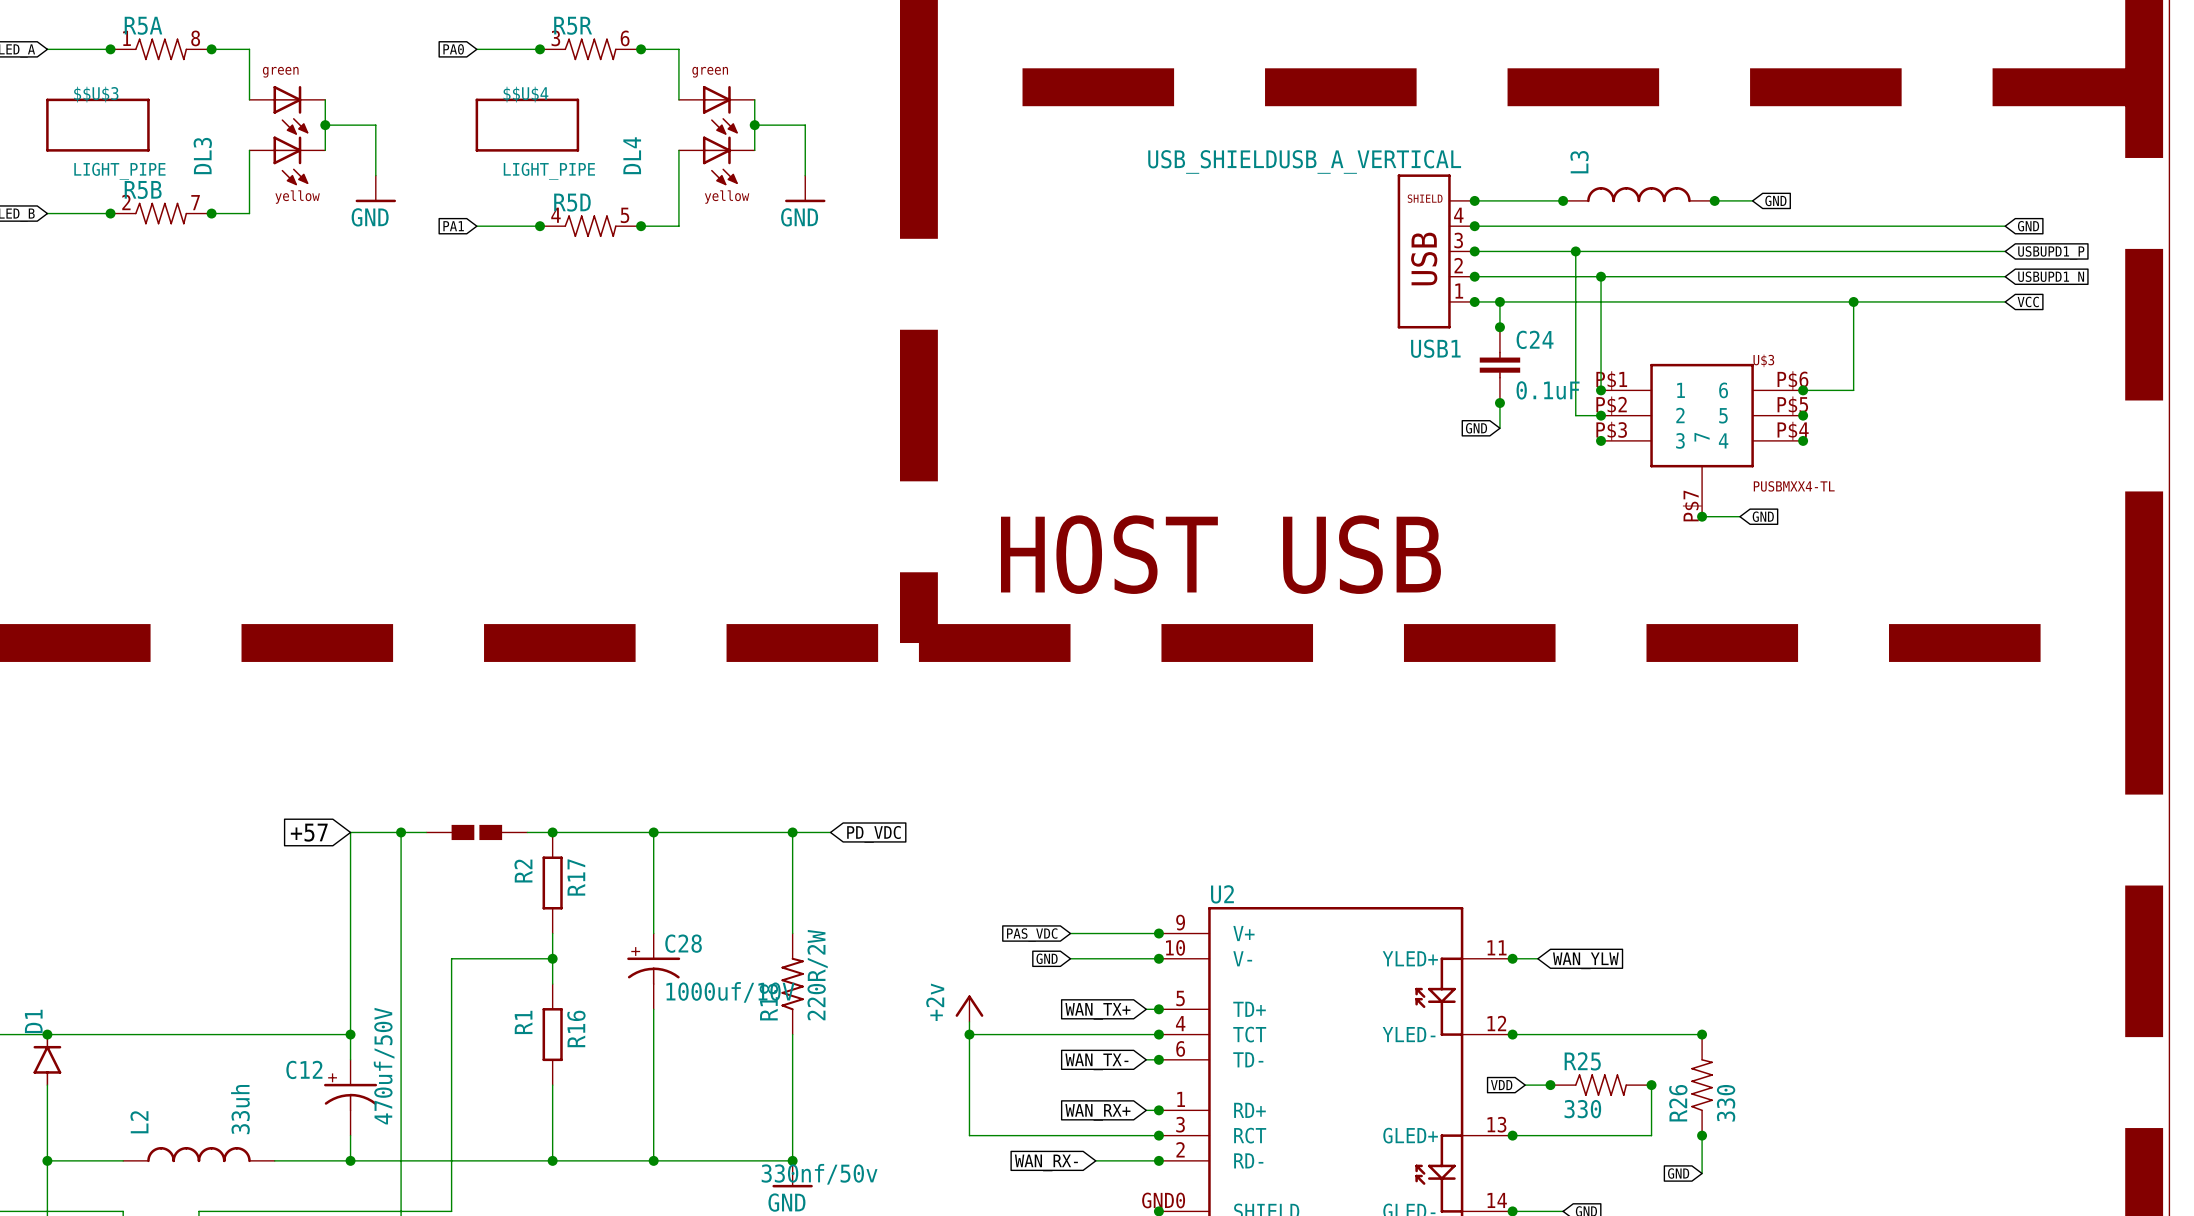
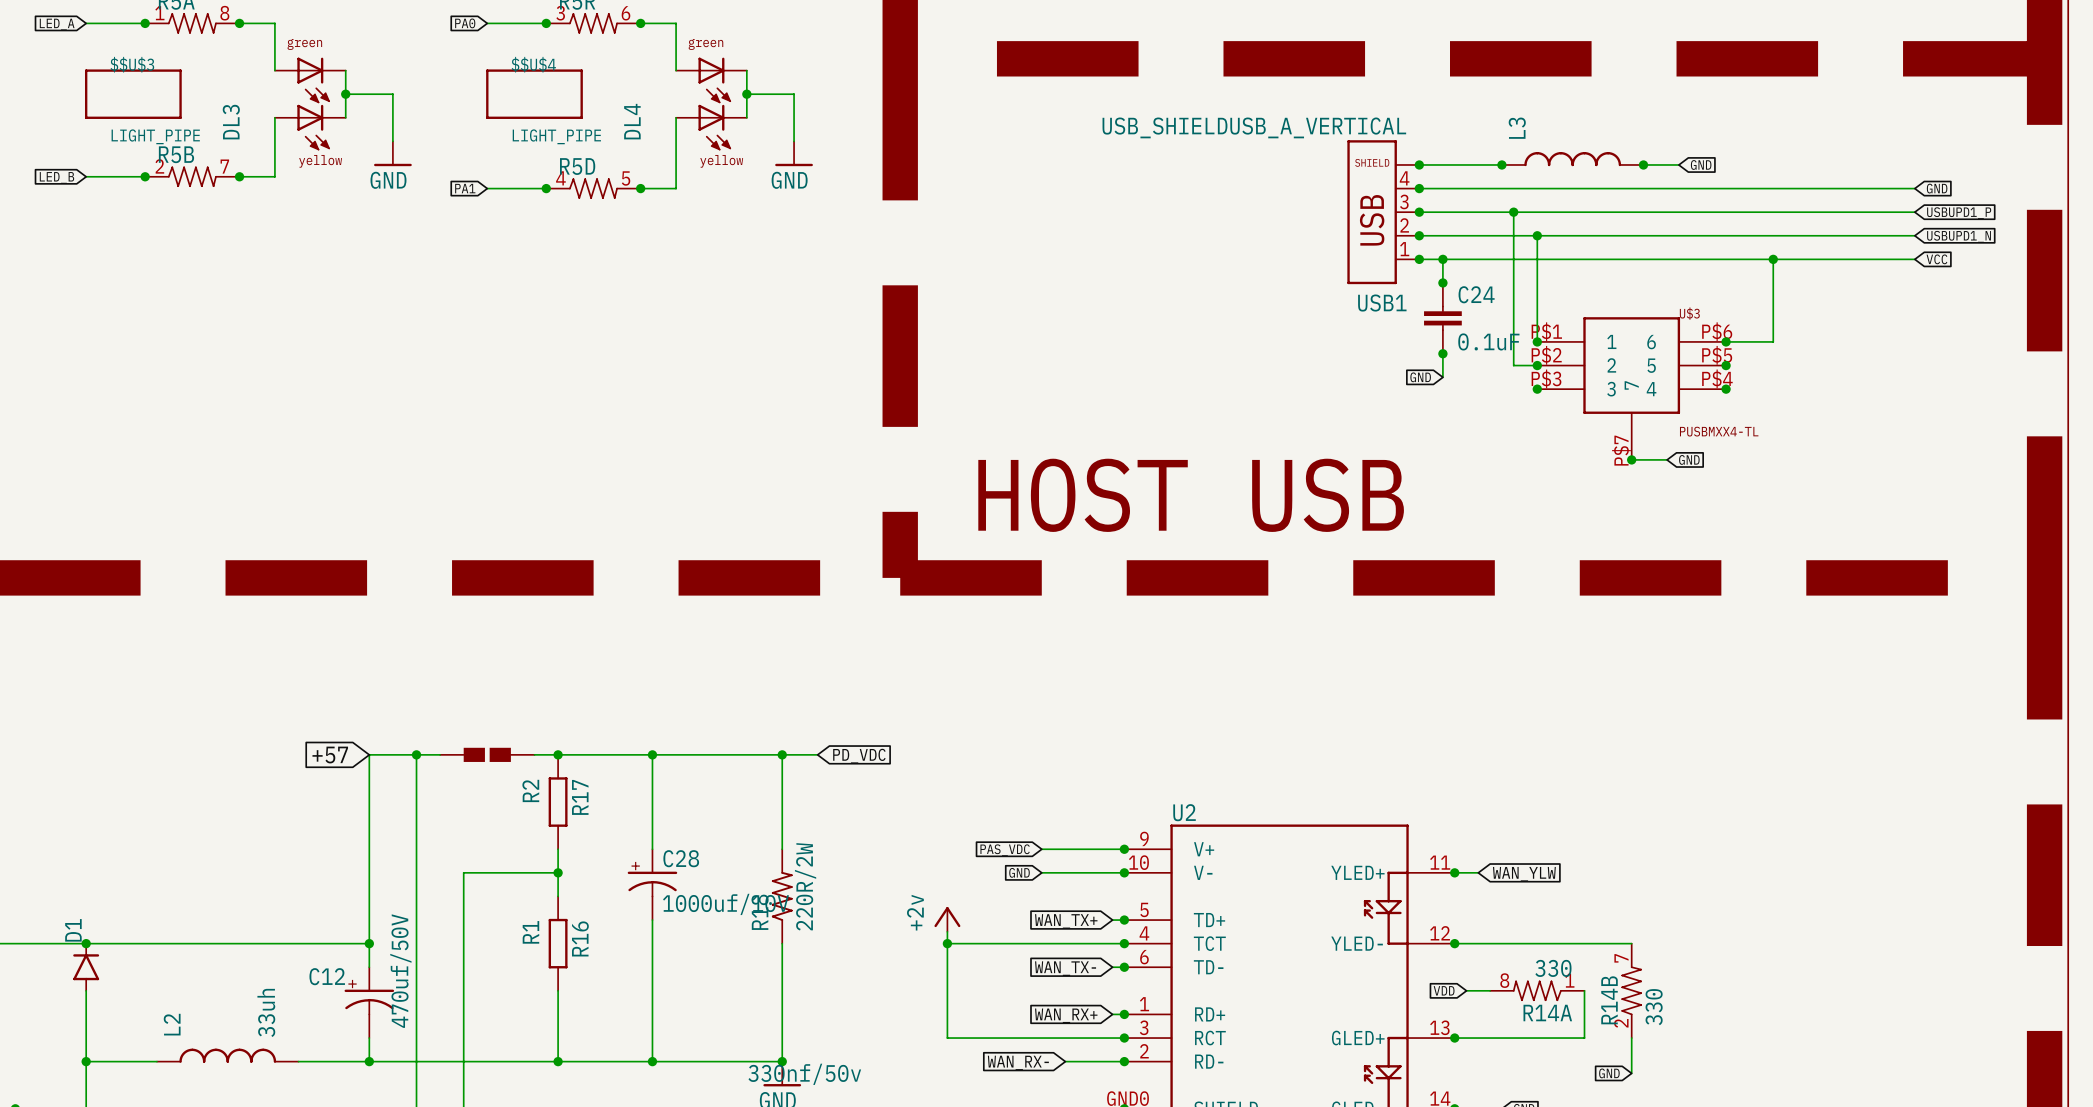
junction: (1702, 1034) -> none
R26 pin number: none -> 7 (1621, 958)
junction: (1550, 1085) -> none
R25: 330 (1601, 1085) -> none
R14A: none -> 330 (1537, 990)
junction: (1651, 1085) -> none
R26 name: R26 (1678, 1103) -> R14B (1609, 1000)
R26 pin number: none -> 2 (1621, 1023)
junction: (1702, 1135) -> none

